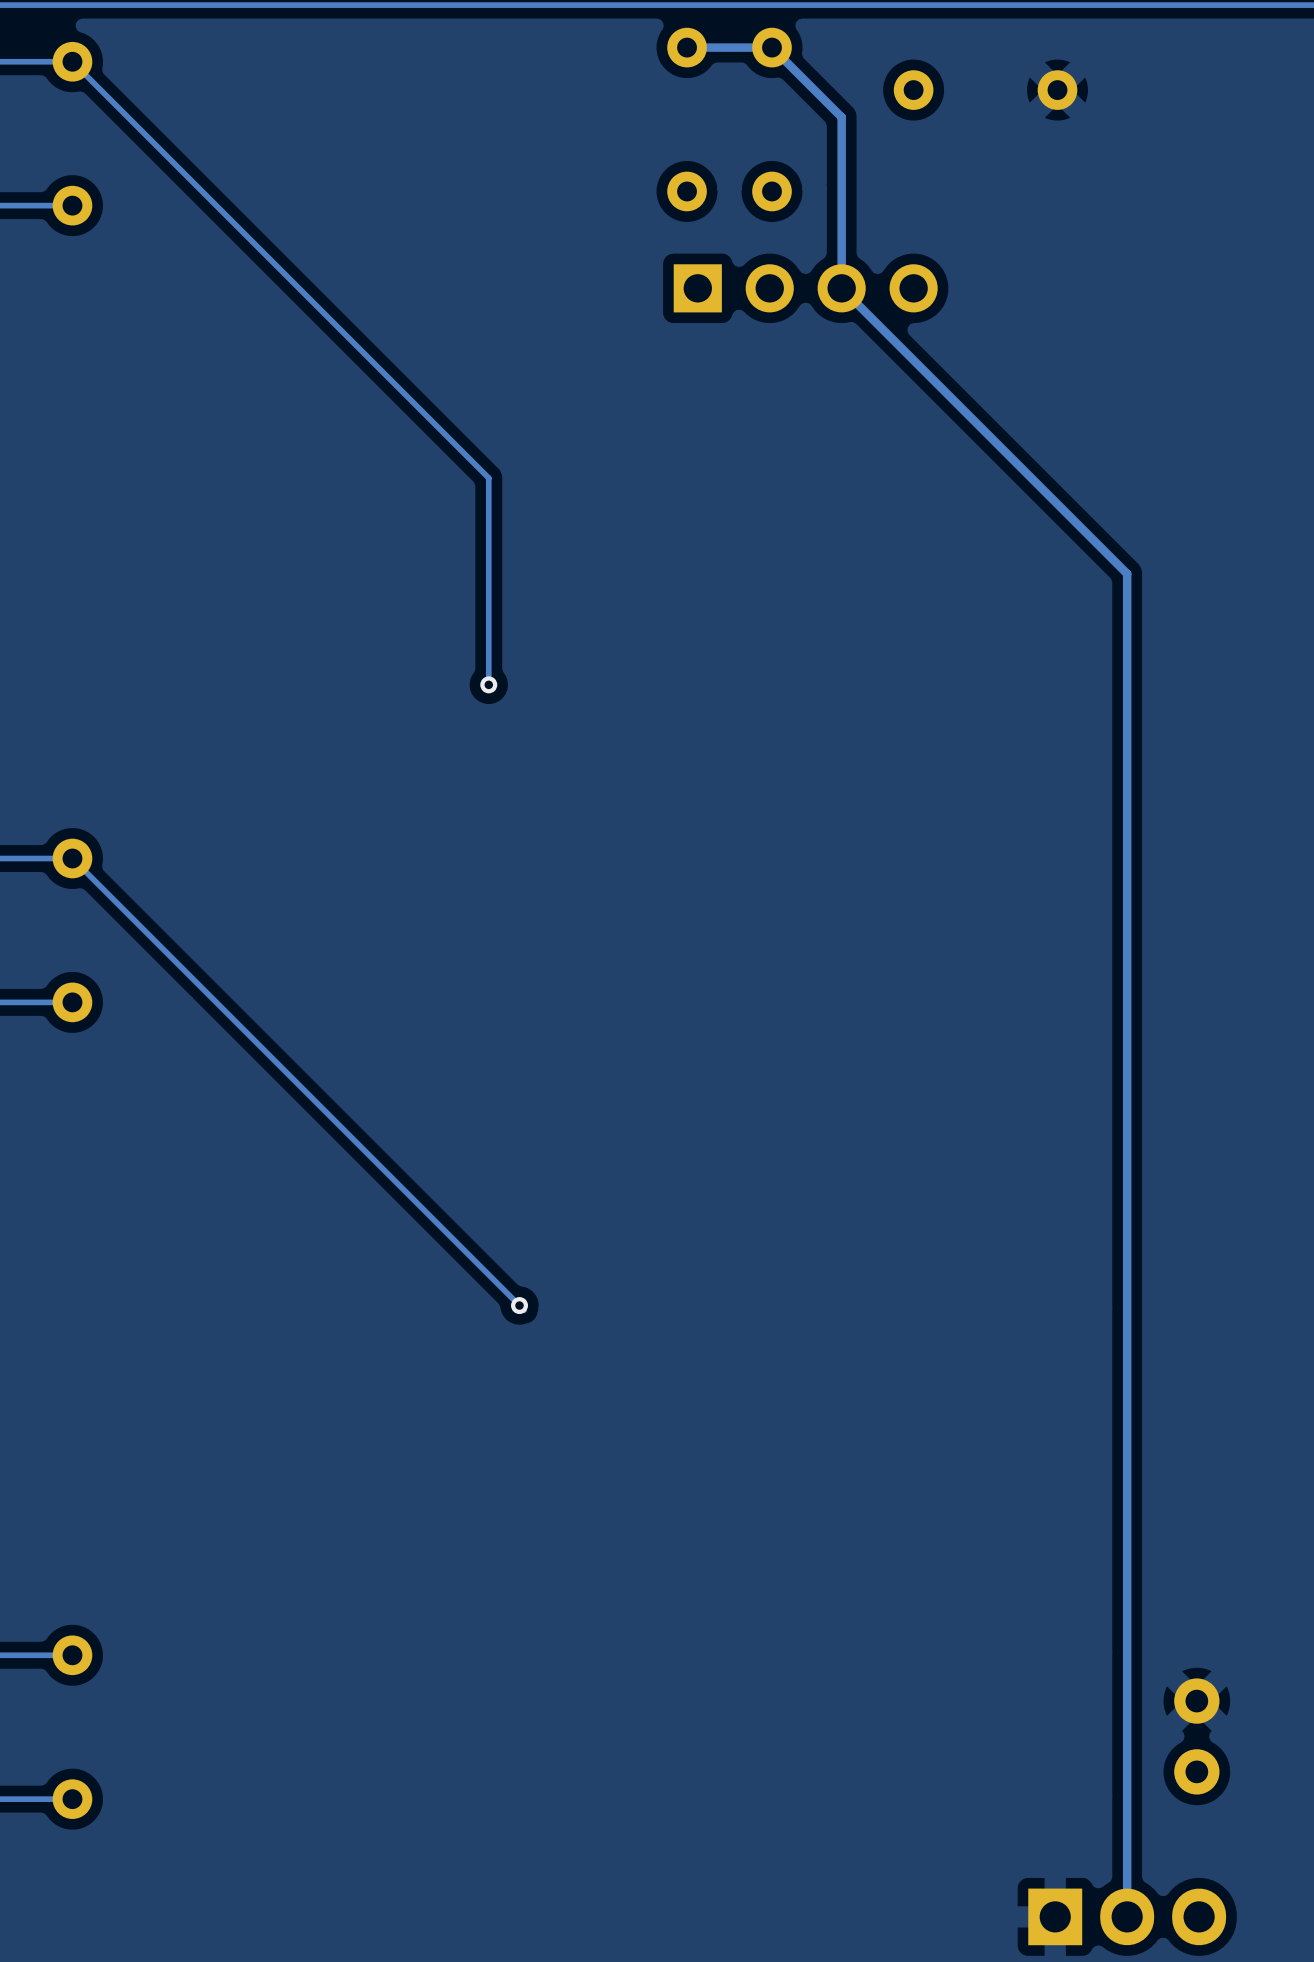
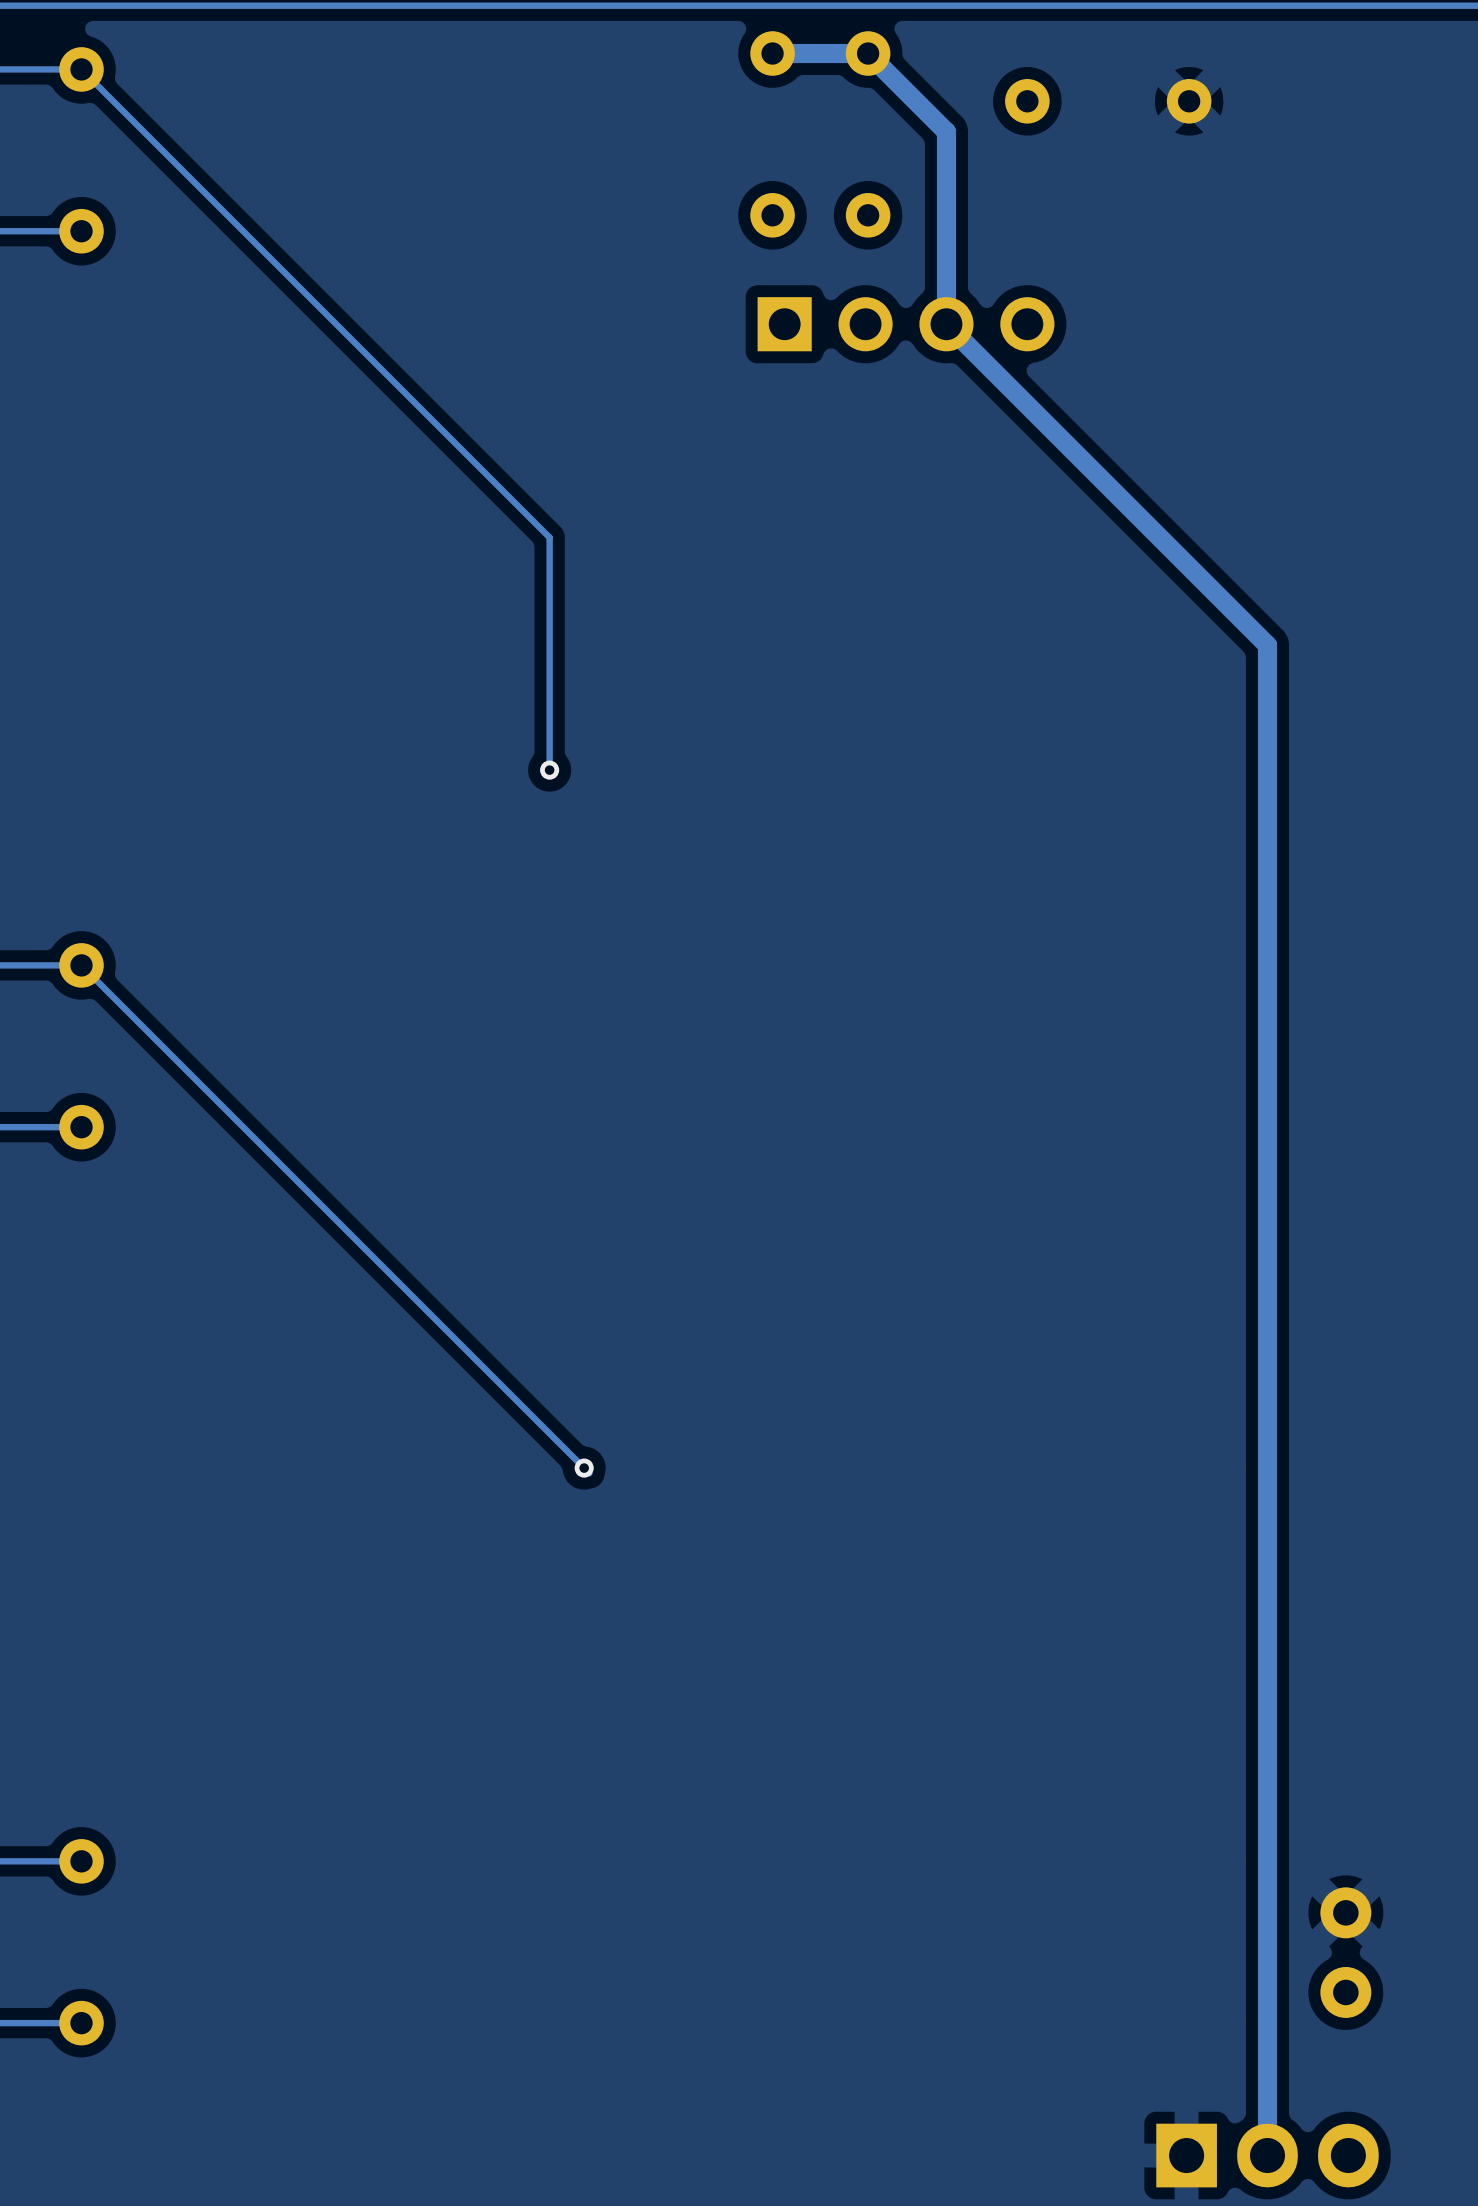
track width: thin (687, 47) (772, 47) (841, 117) (841, 288) (1127, 573) (1127, 1916) -> thick (772, 53) (868, 53) (946, 131) (946, 324) (1267, 645) (1267, 2155)

